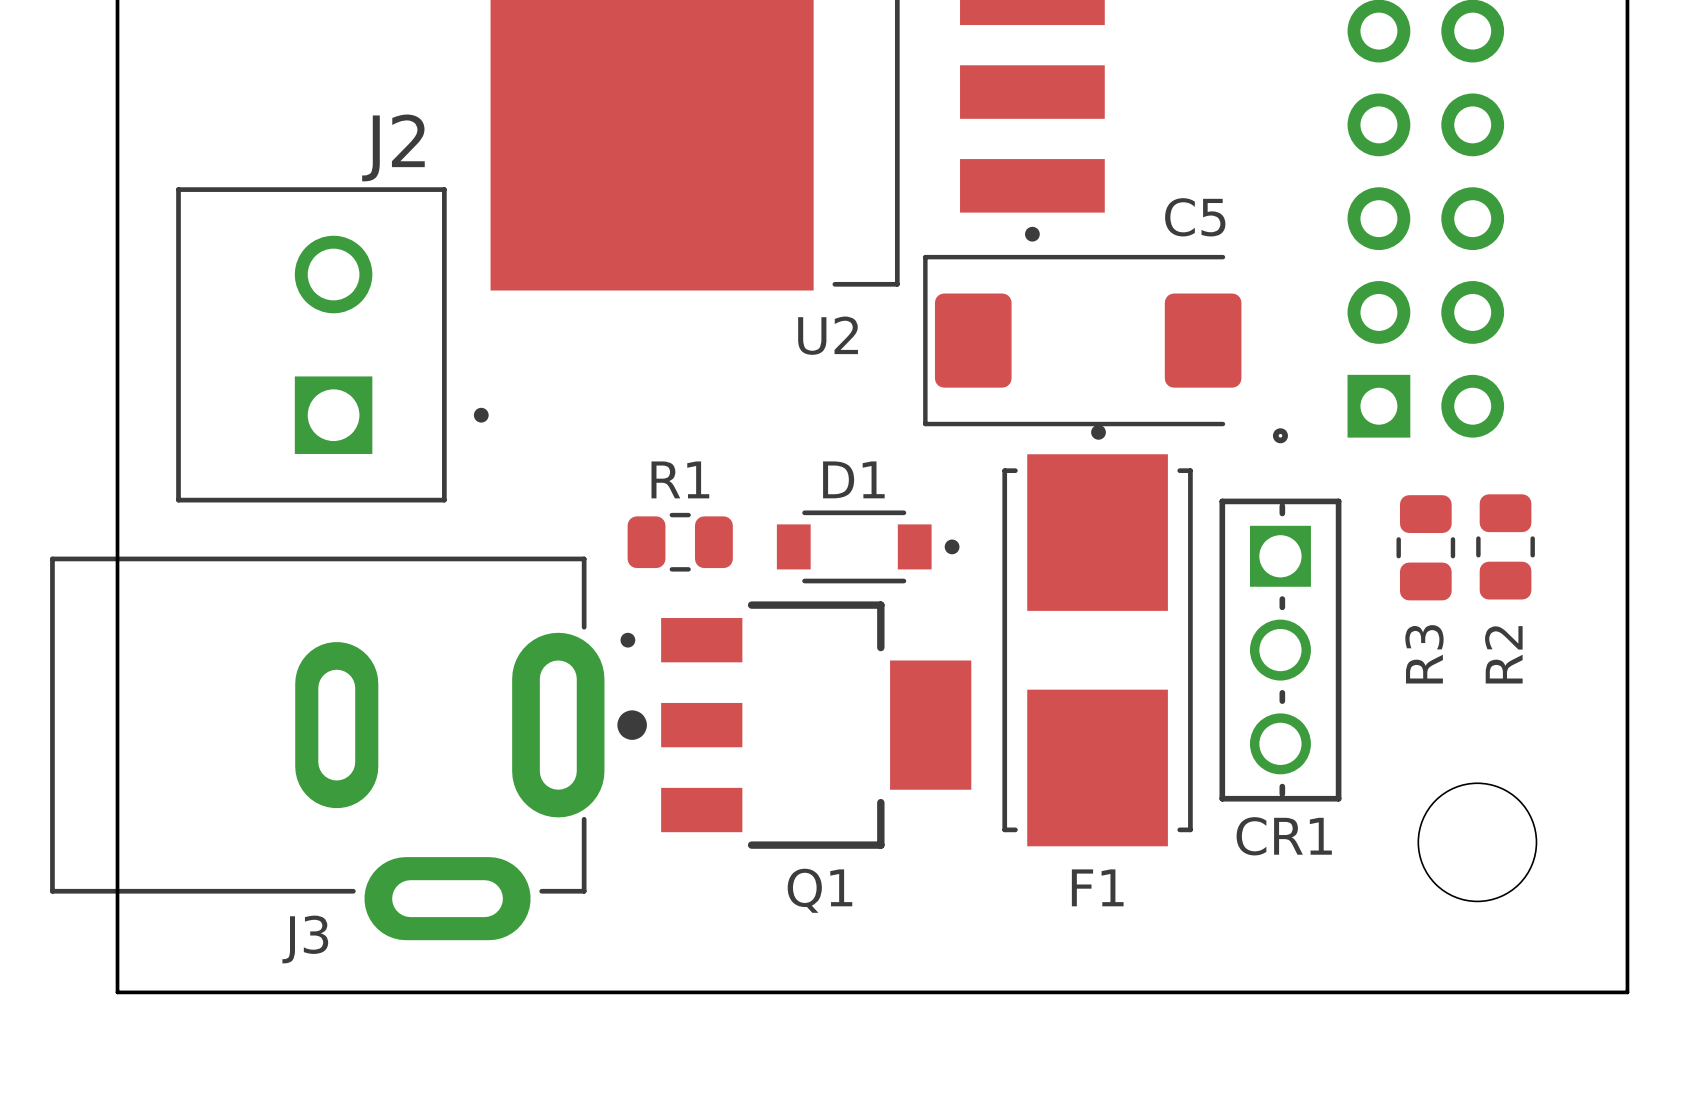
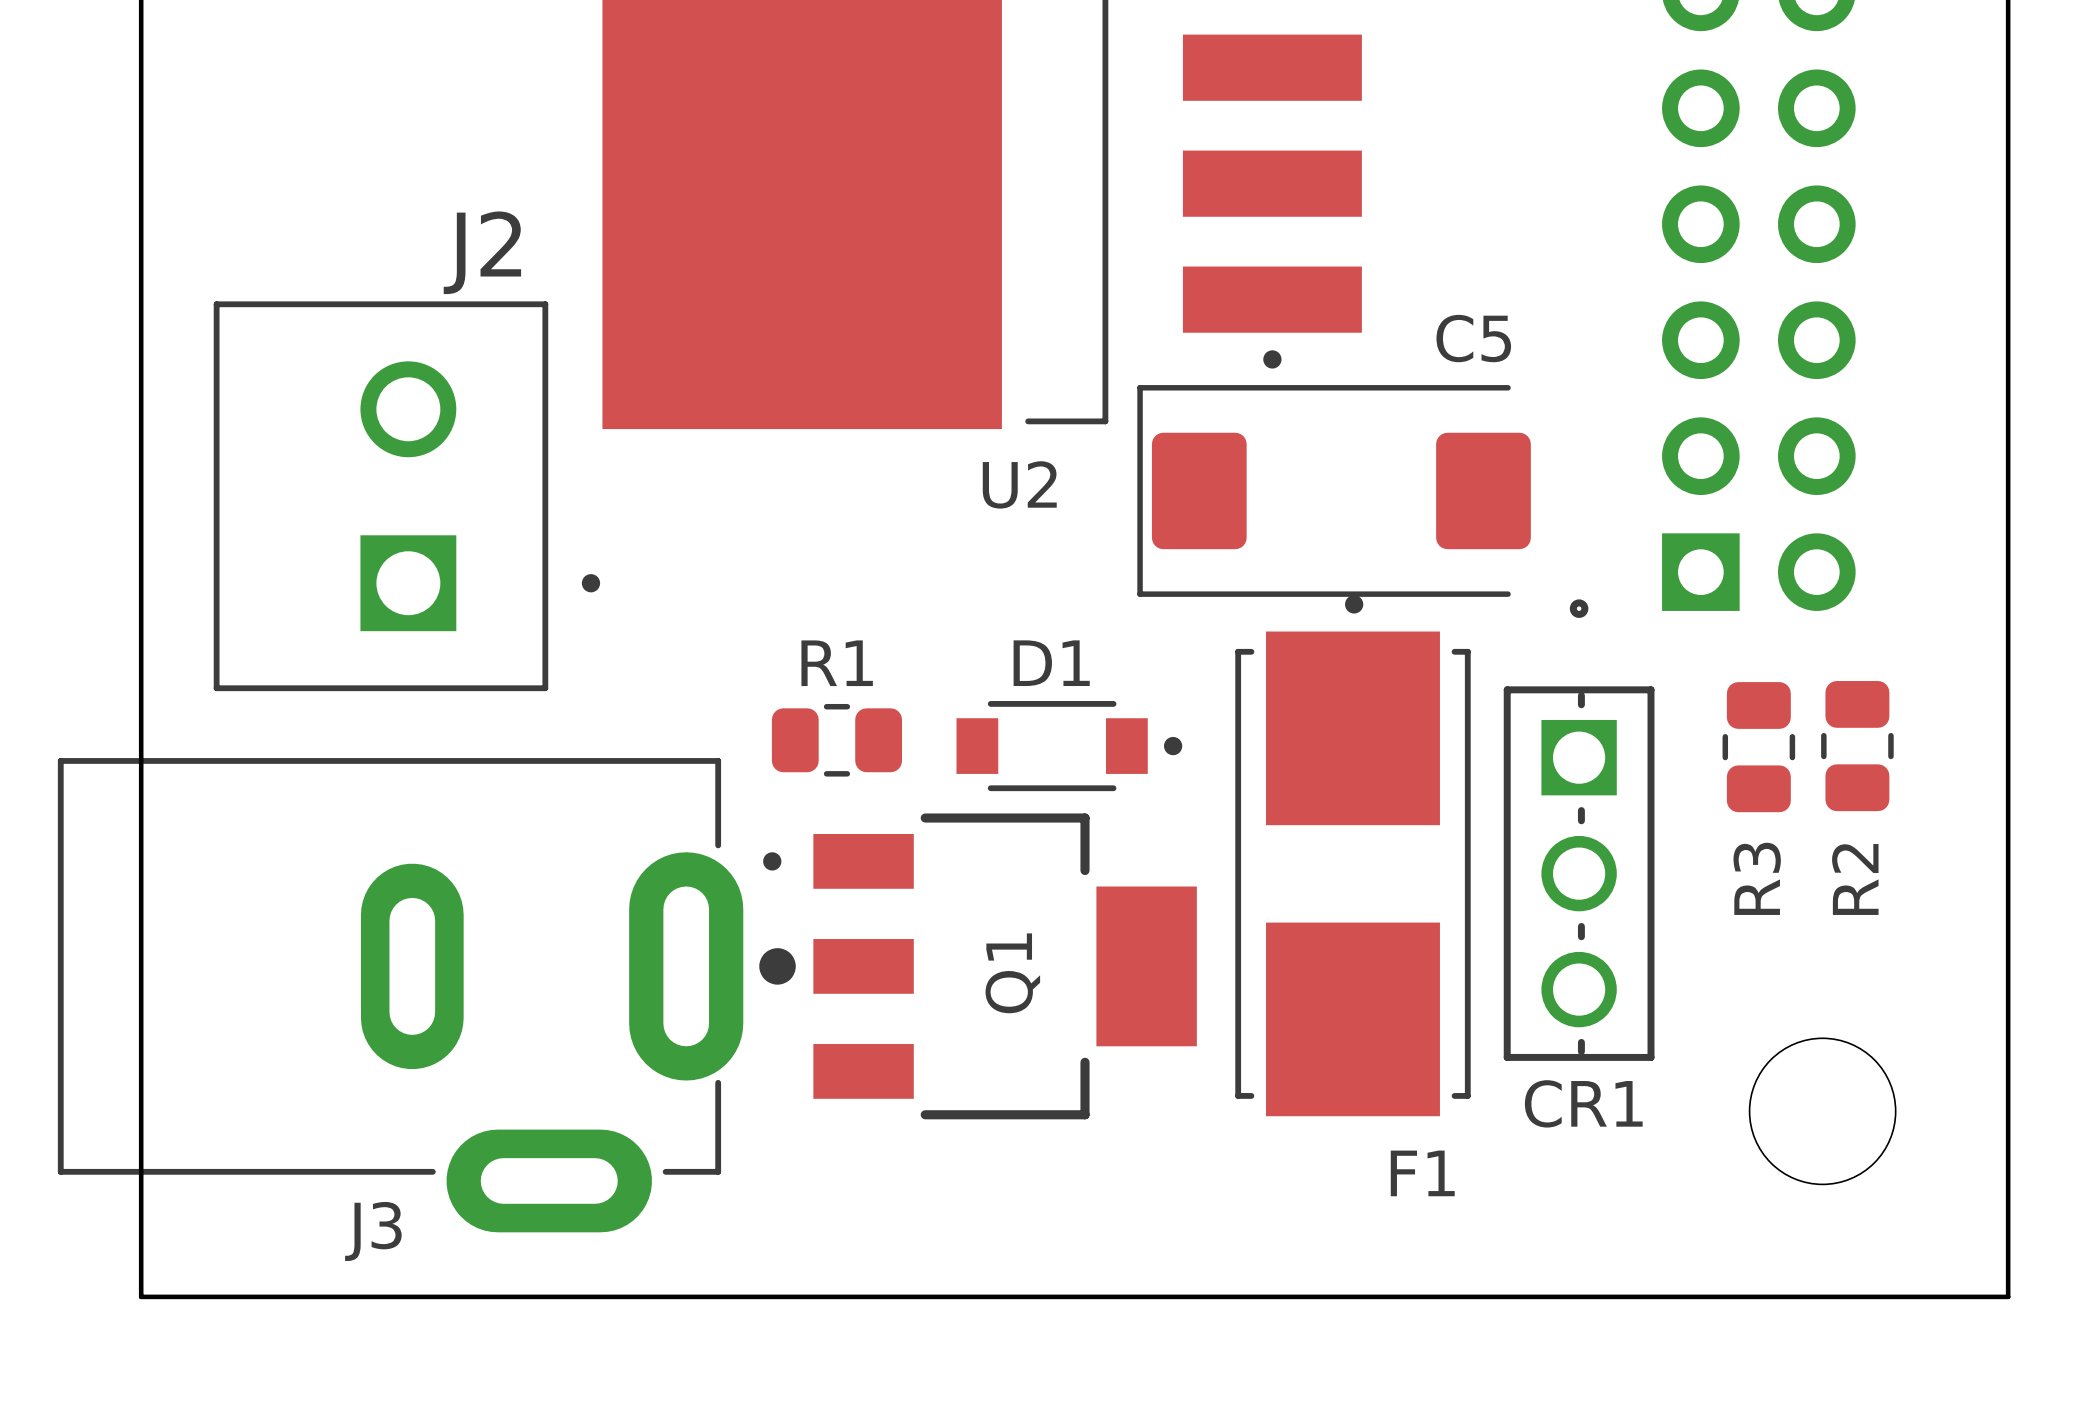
F1 name position: F1 (1097, 887) -> F1 (1422, 1173)
Q1 name rotation: 0° (819, 890) -> 90° counterclockwise (1012, 973)
Q1 name position: Q1 (819, 890) -> Q1 (1012, 973)

